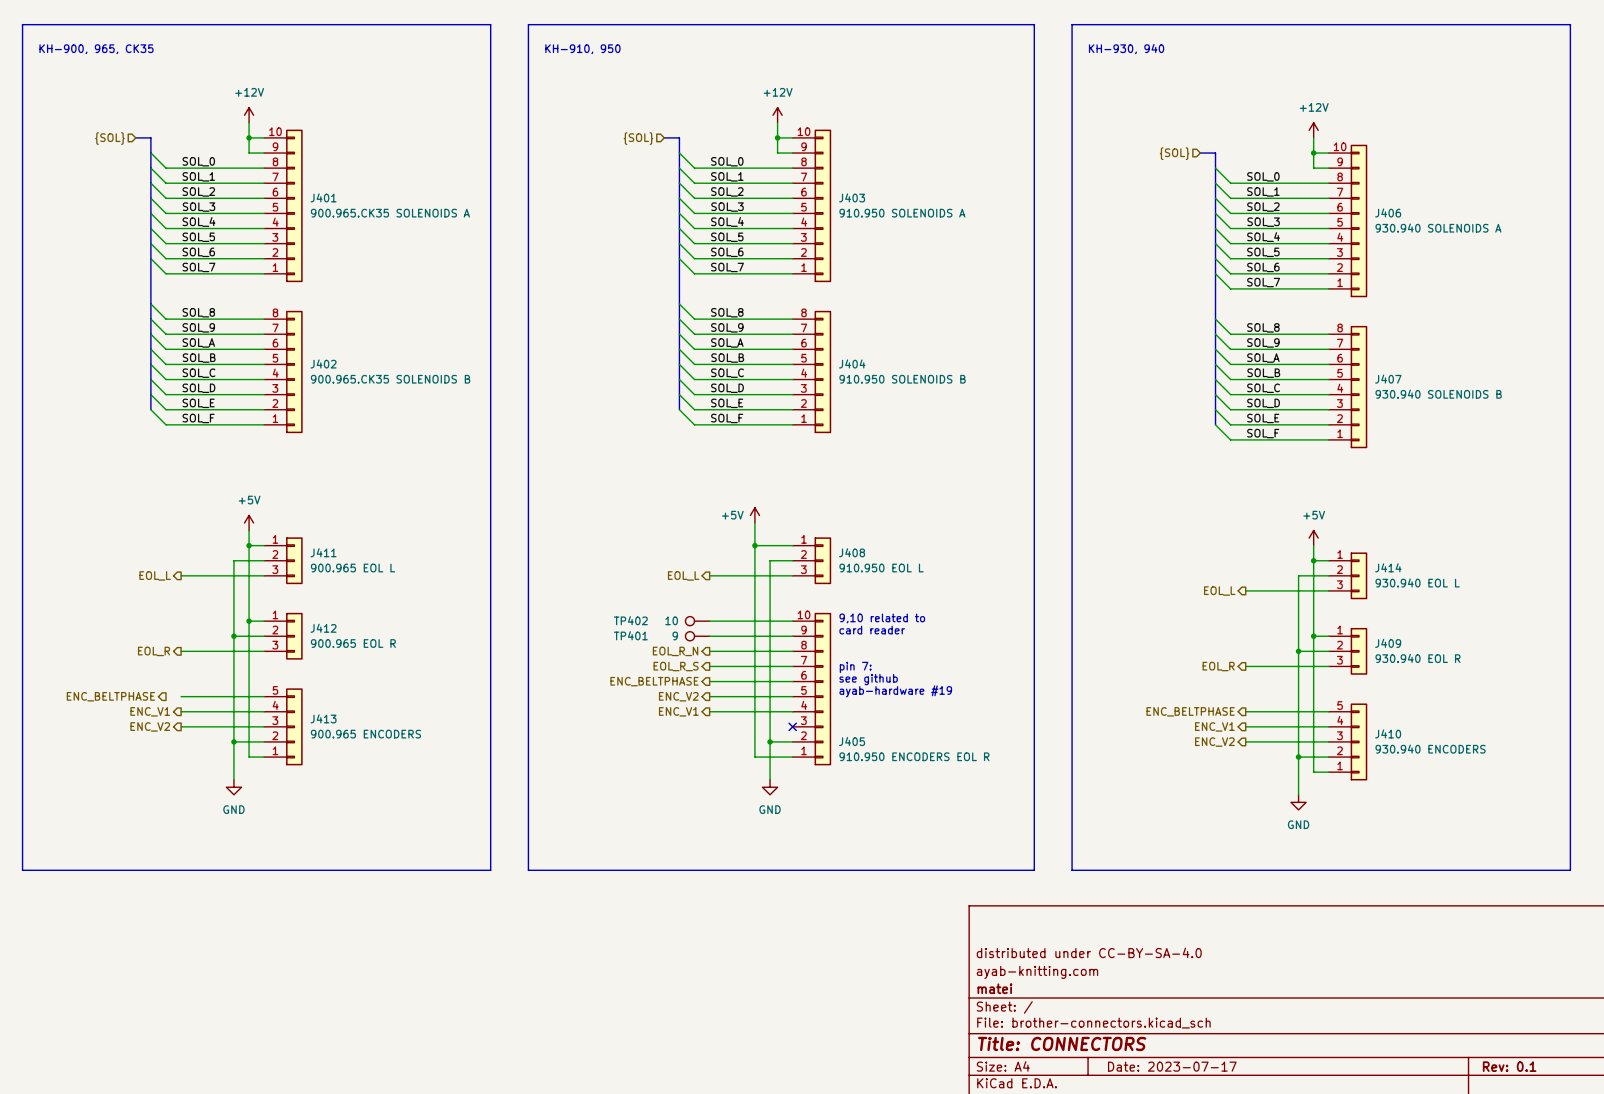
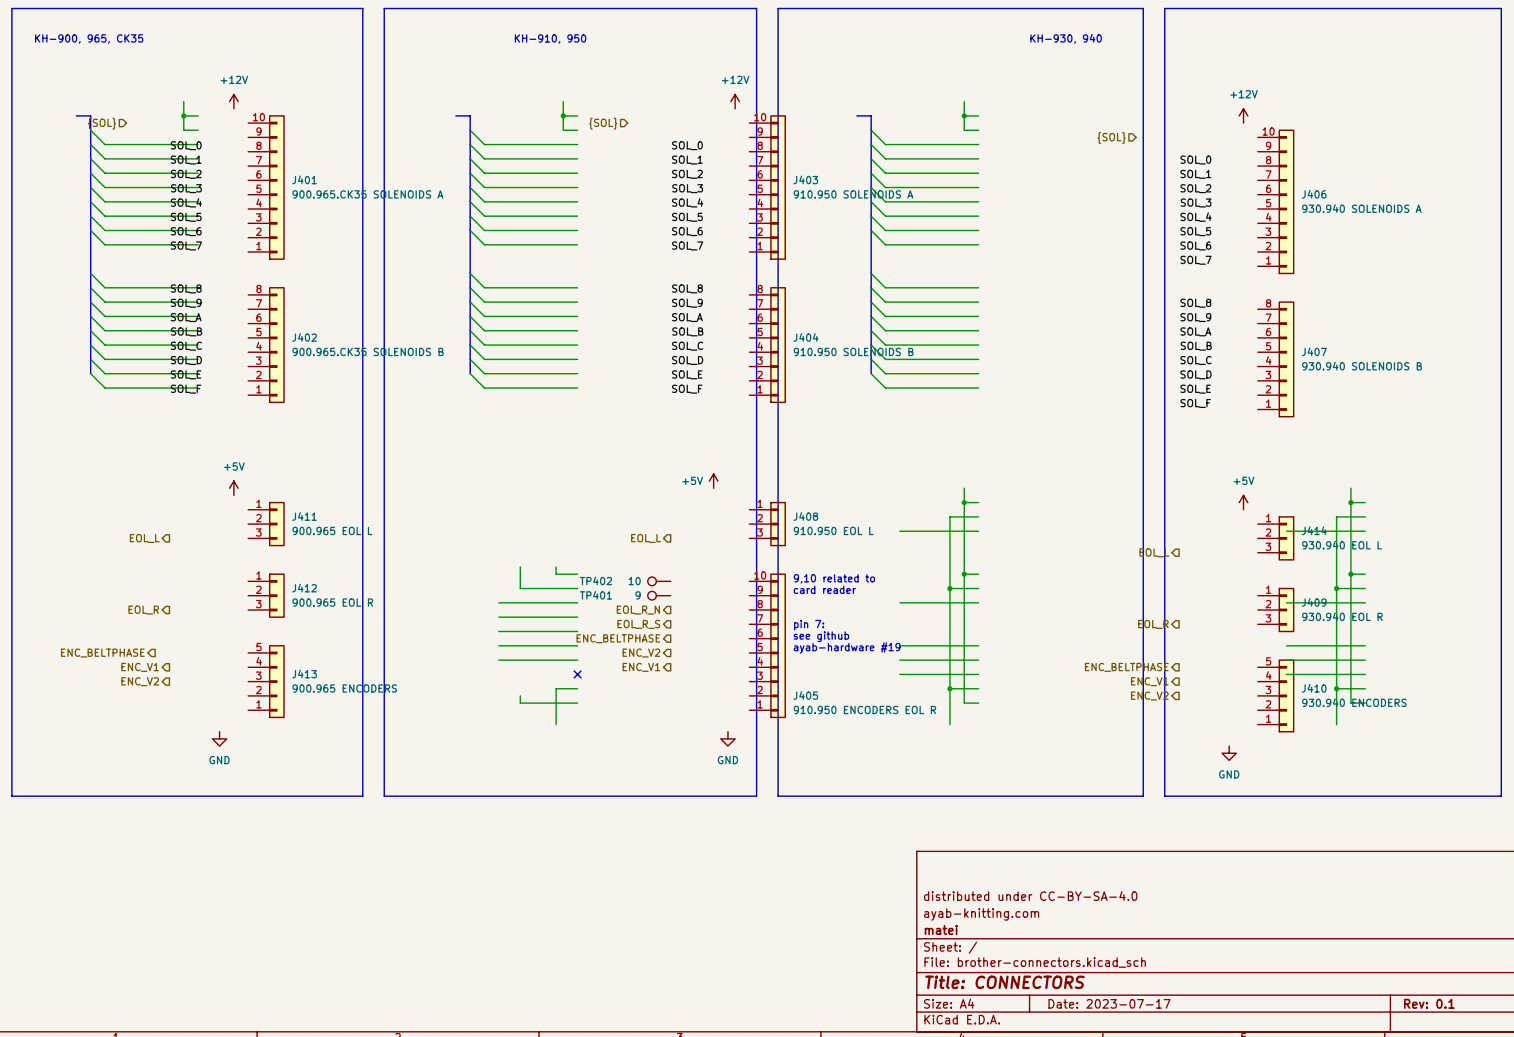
line: none -> (384, 8) (756, 8) (756, 796) (384, 796) (384, 8)
line: none -> (778, 8) (1143, 8) (1143, 796) (778, 796) (778, 8)
line: (22, 24) (22, 870) (490, 870) (490, 24) (22, 24) -> (11, 8) (11, 796) (362, 796) (362, 8) (11, 8)
line: (528, 24) (1034, 24) (1034, 870) (528, 870) (528, 24) -> none
line: (1072, 24) (1570, 24) (1570, 870) (1072, 870) (1072, 24) -> (1164, 8) (1164, 796) (1501, 796) (1501, 8) (1164, 8)
wire: none -> (563, 101) (563, 130) (577, 130)
wire: none -> (964, 101) (964, 130) (978, 130)
wire: (249, 122) (249, 153) (264, 153) -> (183, 101) (183, 130) (198, 130)
wire: (777, 122) (777, 153) (792, 153) -> none
junction: none -> (183, 115)
bus: none -> (455, 115) (470, 115) (470, 373)
wire: none -> (563, 115) (577, 115)
junction: none -> (563, 115)
bus: none -> (856, 115) (871, 115) (871, 373)
wire: none -> (964, 115) (978, 115)
junction: none -> (964, 115)
bus: (135, 137) (150, 137) (150, 409) -> (76, 115) (90, 115) (90, 373)
wire: (249, 137) (264, 137) -> (183, 115) (198, 115)
junction: (249, 137) -> none
bus: (664, 137) (679, 137) (679, 409) -> none
wire: (777, 137) (792, 137) -> none
junction: (777, 137) -> none
wire: (1313, 137) (1313, 168) (1328, 168) -> none
wire: none -> (470, 130) (484, 144) (577, 144)
wire: none -> (871, 130) (885, 144) (978, 144)
wire: (150, 153) (166, 168) (264, 168) -> (90, 130) (105, 144) (198, 144)
wire: (679, 153) (694, 168) (792, 168) -> none
bus: (1200, 153) (1215, 153) (1215, 424) -> none
wire: (1313, 153) (1328, 153) -> none
junction: (1313, 153) -> none
wire: none -> (470, 144) (484, 158) (577, 158)
wire: none -> (871, 144) (885, 158) (978, 158)
wire: (150, 168) (166, 183) (264, 183) -> (90, 144) (105, 158) (198, 158)
wire: (679, 168) (694, 183) (792, 183) -> none
wire: (1215, 168) (1230, 183) (1328, 183) -> none
wire: none -> (470, 158) (484, 173) (577, 173)
wire: none -> (871, 158) (885, 173) (978, 173)
wire: (150, 183) (166, 198) (264, 198) -> (90, 158) (105, 173) (198, 173)
wire: (679, 183) (694, 198) (792, 198) -> none
wire: (1215, 183) (1230, 198) (1328, 198) -> none
wire: none -> (470, 173) (484, 187) (577, 187)
wire: none -> (871, 173) (885, 187) (978, 187)
wire: (150, 198) (166, 213) (264, 213) -> (90, 173) (105, 187) (198, 187)
wire: (679, 198) (694, 213) (792, 213) -> none
wire: (1215, 198) (1230, 213) (1328, 213) -> none
wire: none -> (470, 187) (484, 201) (577, 201)
wire: none -> (871, 187) (885, 201) (978, 201)
wire: (150, 213) (166, 228) (264, 228) -> (90, 187) (105, 201) (198, 201)
wire: (679, 213) (694, 228) (792, 228) -> none
wire: (1215, 213) (1230, 228) (1328, 228) -> none
wire: none -> (470, 201) (484, 216) (577, 216)
wire: none -> (871, 201) (885, 216) (978, 216)
wire: (150, 228) (166, 243) (264, 243) -> (90, 201) (105, 216) (198, 216)
wire: (679, 228) (694, 243) (792, 243) -> none
wire: (1215, 228) (1230, 243) (1328, 243) -> none
wire: none -> (470, 216) (484, 230) (577, 230)
wire: none -> (871, 216) (885, 230) (978, 230)
wire: (150, 243) (166, 258) (264, 258) -> (90, 216) (105, 230) (198, 230)
wire: (679, 243) (694, 258) (792, 258) -> none
wire: (1215, 243) (1230, 258) (1328, 258) -> none
wire: none -> (470, 230) (484, 244) (577, 244)
wire: none -> (871, 230) (885, 244) (978, 244)
wire: (150, 258) (166, 273) (264, 273) -> (90, 230) (105, 244) (198, 244)
wire: (679, 258) (694, 273) (792, 273) -> none
wire: (1215, 258) (1230, 273) (1328, 273) -> none
wire: (1215, 273) (1230, 288) (1328, 288) -> none
wire: none -> (470, 273) (484, 287) (577, 287)
wire: none -> (871, 273) (885, 287) (978, 287)
wire: (150, 304) (166, 319) (264, 319) -> (90, 273) (105, 287) (198, 287)
wire: (679, 304) (694, 319) (792, 319) -> none
wire: none -> (470, 287) (484, 302) (577, 302)
wire: none -> (871, 287) (885, 302) (978, 302)
wire: (150, 319) (166, 334) (264, 334) -> (90, 287) (105, 302) (198, 302)
wire: (679, 319) (694, 334) (792, 334) -> none
wire: (1215, 319) (1230, 334) (1328, 334) -> none
wire: none -> (470, 302) (484, 316) (577, 316)
wire: none -> (871, 302) (885, 316) (978, 316)
wire: (150, 334) (166, 349) (264, 349) -> (90, 302) (105, 316) (198, 316)
wire: (679, 334) (694, 349) (792, 349) -> none
wire: (1215, 334) (1230, 349) (1328, 349) -> none
wire: none -> (470, 316) (484, 330) (577, 330)
wire: none -> (871, 316) (885, 330) (978, 330)
wire: (150, 349) (166, 364) (264, 364) -> (90, 316) (105, 330) (198, 330)
wire: (679, 349) (694, 364) (792, 364) -> none
wire: (1215, 349) (1230, 364) (1328, 364) -> none
wire: none -> (470, 330) (484, 345) (577, 345)
wire: none -> (871, 330) (885, 345) (978, 345)
wire: (150, 364) (166, 379) (264, 379) -> (90, 330) (105, 345) (198, 345)
wire: (679, 364) (694, 379) (792, 379) -> none
wire: (1215, 364) (1230, 379) (1328, 379) -> none
wire: none -> (470, 345) (484, 359) (577, 359)
wire: none -> (871, 345) (885, 359) (978, 359)
wire: (150, 379) (166, 394) (264, 394) -> (90, 345) (105, 359) (198, 359)
wire: (679, 379) (694, 394) (792, 394) -> none
wire: (1215, 379) (1230, 394) (1328, 394) -> none
wire: none -> (470, 359) (484, 373) (577, 373)
wire: none -> (871, 359) (885, 373) (978, 373)
wire: (150, 394) (166, 409) (264, 409) -> (90, 359) (105, 373) (198, 373)
wire: (679, 394) (694, 409) (792, 409) -> none
wire: (1215, 394) (1230, 409) (1328, 409) -> none
wire: none -> (470, 373) (484, 388) (577, 388)
wire: none -> (871, 373) (885, 388) (978, 388)
wire: (150, 409) (166, 424) (264, 424) -> (90, 373) (105, 388) (198, 388)
wire: (679, 409) (694, 424) (792, 424) -> none
wire: (1215, 409) (1230, 424) (1328, 424) -> none
wire: (1215, 424) (1230, 439) (1328, 439) -> none
wire: (754, 522) (754, 757) (792, 757) -> none
wire: none -> (964, 488) (964, 703) (978, 703)
wire: (249, 530) (249, 757) (264, 757) -> none
wire: none -> (964, 502) (978, 502)
junction: none -> (964, 502)
junction: none -> (1350, 502)
wire: (249, 545) (264, 545) -> none
junction: (249, 545) -> none
wire: (754, 545) (792, 545) -> none
junction: (754, 545) -> none
wire: (1313, 545) (1313, 772) (1328, 772) -> (1350, 488) (1350, 703) (1365, 703)
wire: none -> (978, 516) (949, 516) (949, 724)
wire: (264, 560) (233, 560) (233, 779) -> none
wire: (792, 560) (770, 560) (770, 779) -> none
wire: (1313, 560) (1328, 560) -> (1350, 502) (1365, 502)
junction: (1313, 560) -> none
wire: none -> (899, 531) (978, 531)
wire: (181, 575) (264, 575) -> none
wire: (709, 575) (792, 575) -> none
wire: (1328, 575) (1298, 575) (1298, 794) -> (1365, 516) (1336, 516) (1336, 724)
wire: (1245, 590) (1328, 590) -> (1286, 531) (1365, 531)
wire: none -> (520, 567) (520, 588) (577, 588)
wire: none -> (556, 567) (556, 574) (577, 574)
wire: none -> (964, 574) (978, 574)
junction: none -> (964, 574)
junction: none -> (1350, 574)
wire: (249, 621) (264, 621) -> none
junction: (249, 621) -> none
wire: (709, 621) (792, 621) -> none
wire: none -> (949, 588) (978, 588)
junction: none -> (949, 588)
junction: none -> (1336, 588)
wire: (233, 636) (264, 636) -> none
junction: (233, 636) -> none
wire: (709, 636) (792, 636) -> none
wire: (1313, 636) (1328, 636) -> (1350, 574) (1365, 574)
junction: (1313, 636) -> none
wire: none -> (498, 602) (577, 602)
wire: none -> (899, 602) (978, 602)
wire: (181, 651) (264, 651) -> none
wire: (709, 651) (792, 651) -> none
wire: (1298, 651) (1328, 651) -> (1336, 588) (1365, 588)
junction: (1298, 651) -> none
wire: none -> (498, 617) (577, 617)
wire: (709, 666) (792, 666) -> none
wire: (1245, 666) (1328, 666) -> (1286, 602) (1365, 602)
wire: none -> (498, 631) (577, 631)
wire: (709, 681) (792, 681) -> none
wire: none -> (498, 645) (577, 645)
wire: none -> (899, 645) (978, 645)
wire: (181, 696) (264, 696) -> none
wire: (709, 696) (792, 696) -> none
wire: none -> (498, 660) (577, 660)
wire: none -> (899, 660) (978, 660)
wire: (181, 711) (264, 711) -> none
wire: (709, 711) (792, 711) -> none
wire: (1245, 711) (1328, 711) -> (1286, 645) (1365, 645)
no-connect mark: none -> (577, 674)
wire: none -> (899, 674) (978, 674)
wire: (181, 726) (264, 726) -> none
no-connect mark: (792, 726) -> none
wire: (1245, 726) (1328, 726) -> (1286, 660) (1365, 660)
wire: none -> (577, 688) (556, 688) (556, 724)
wire: none -> (949, 688) (978, 688)
junction: none -> (949, 688)
junction: none -> (1336, 688)
wire: (233, 741) (264, 741) -> none
junction: (233, 741) -> none
wire: none -> (520, 695) (520, 703) (577, 703)
wire: (770, 741) (792, 741) -> none
junction: (770, 741) -> none
wire: (1245, 741) (1328, 741) -> (1286, 674) (1365, 674)
wire: (1298, 757) (1328, 757) -> (1336, 688) (1365, 688)
junction: (1298, 757) -> none

